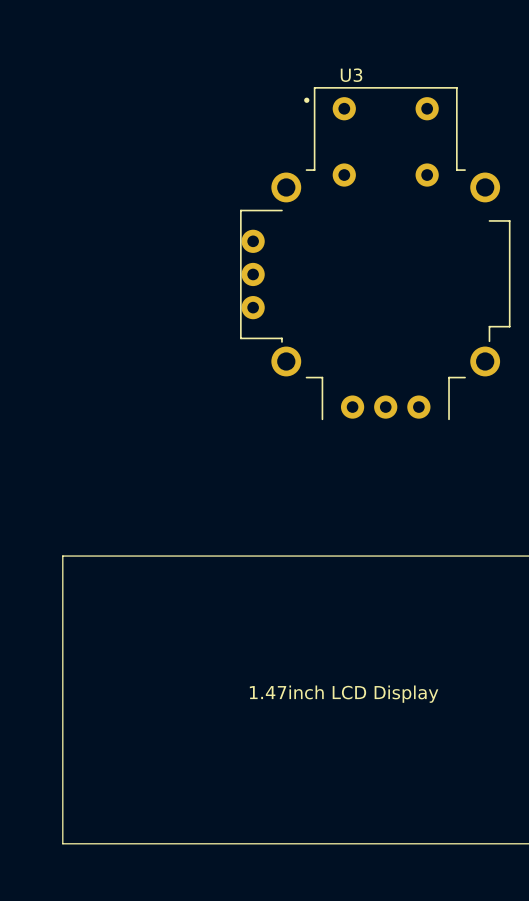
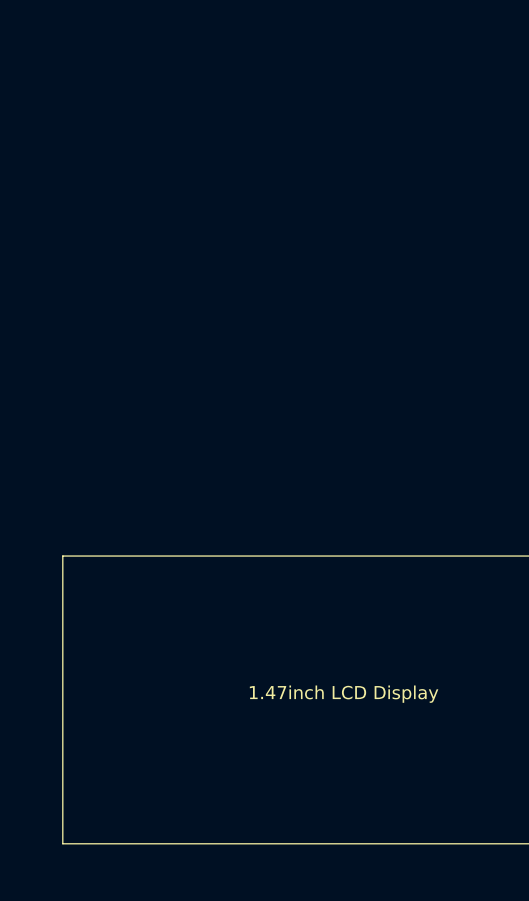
U3: (375, 253) -> none

